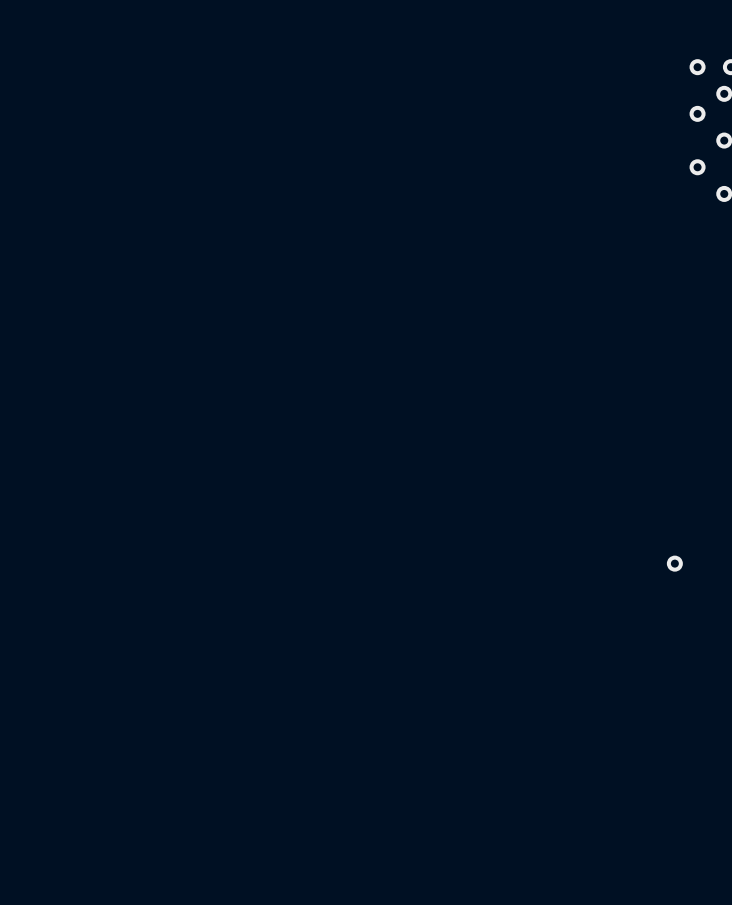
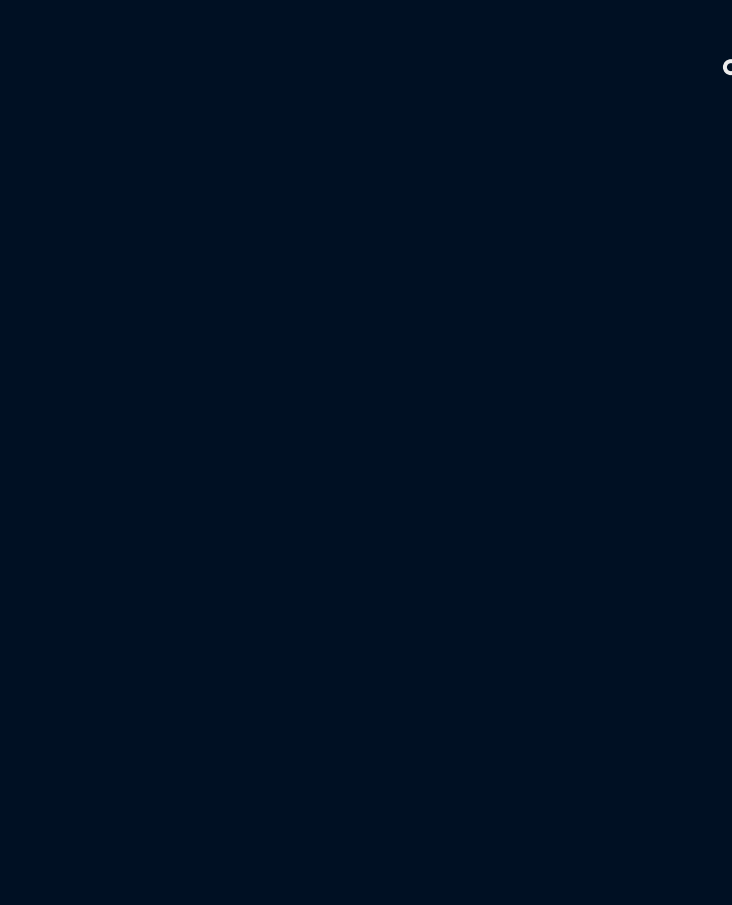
via: (697, 67) -> none
via: (724, 93) -> none
via: (697, 113) -> none
via: (724, 140) -> none
via: (697, 167) -> none
via: (724, 193) -> none
via: (674, 563) -> none

